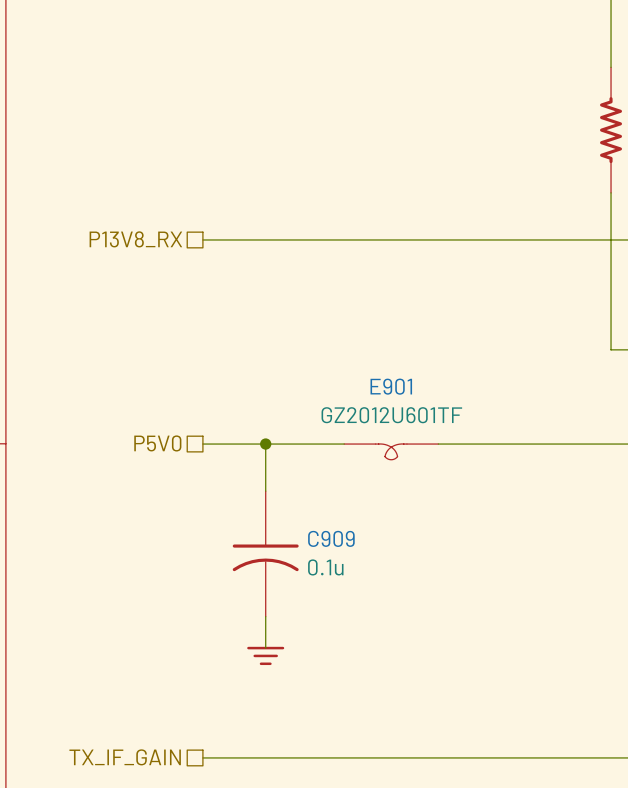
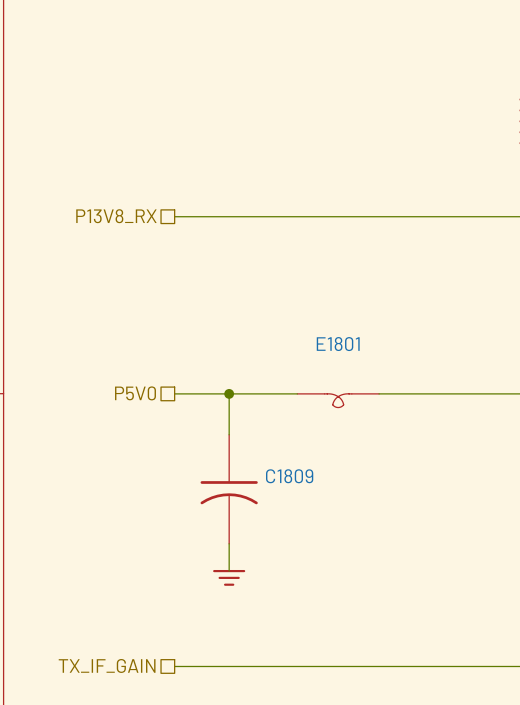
E901 name: E901 (391, 386) -> E1801 (338, 344)
E901 value: GZ2012U601TF (391, 415) -> none
C909 name: C909 (331, 538) -> C1809 (289, 476)
C909 value: 0.1u (325, 567) -> none

